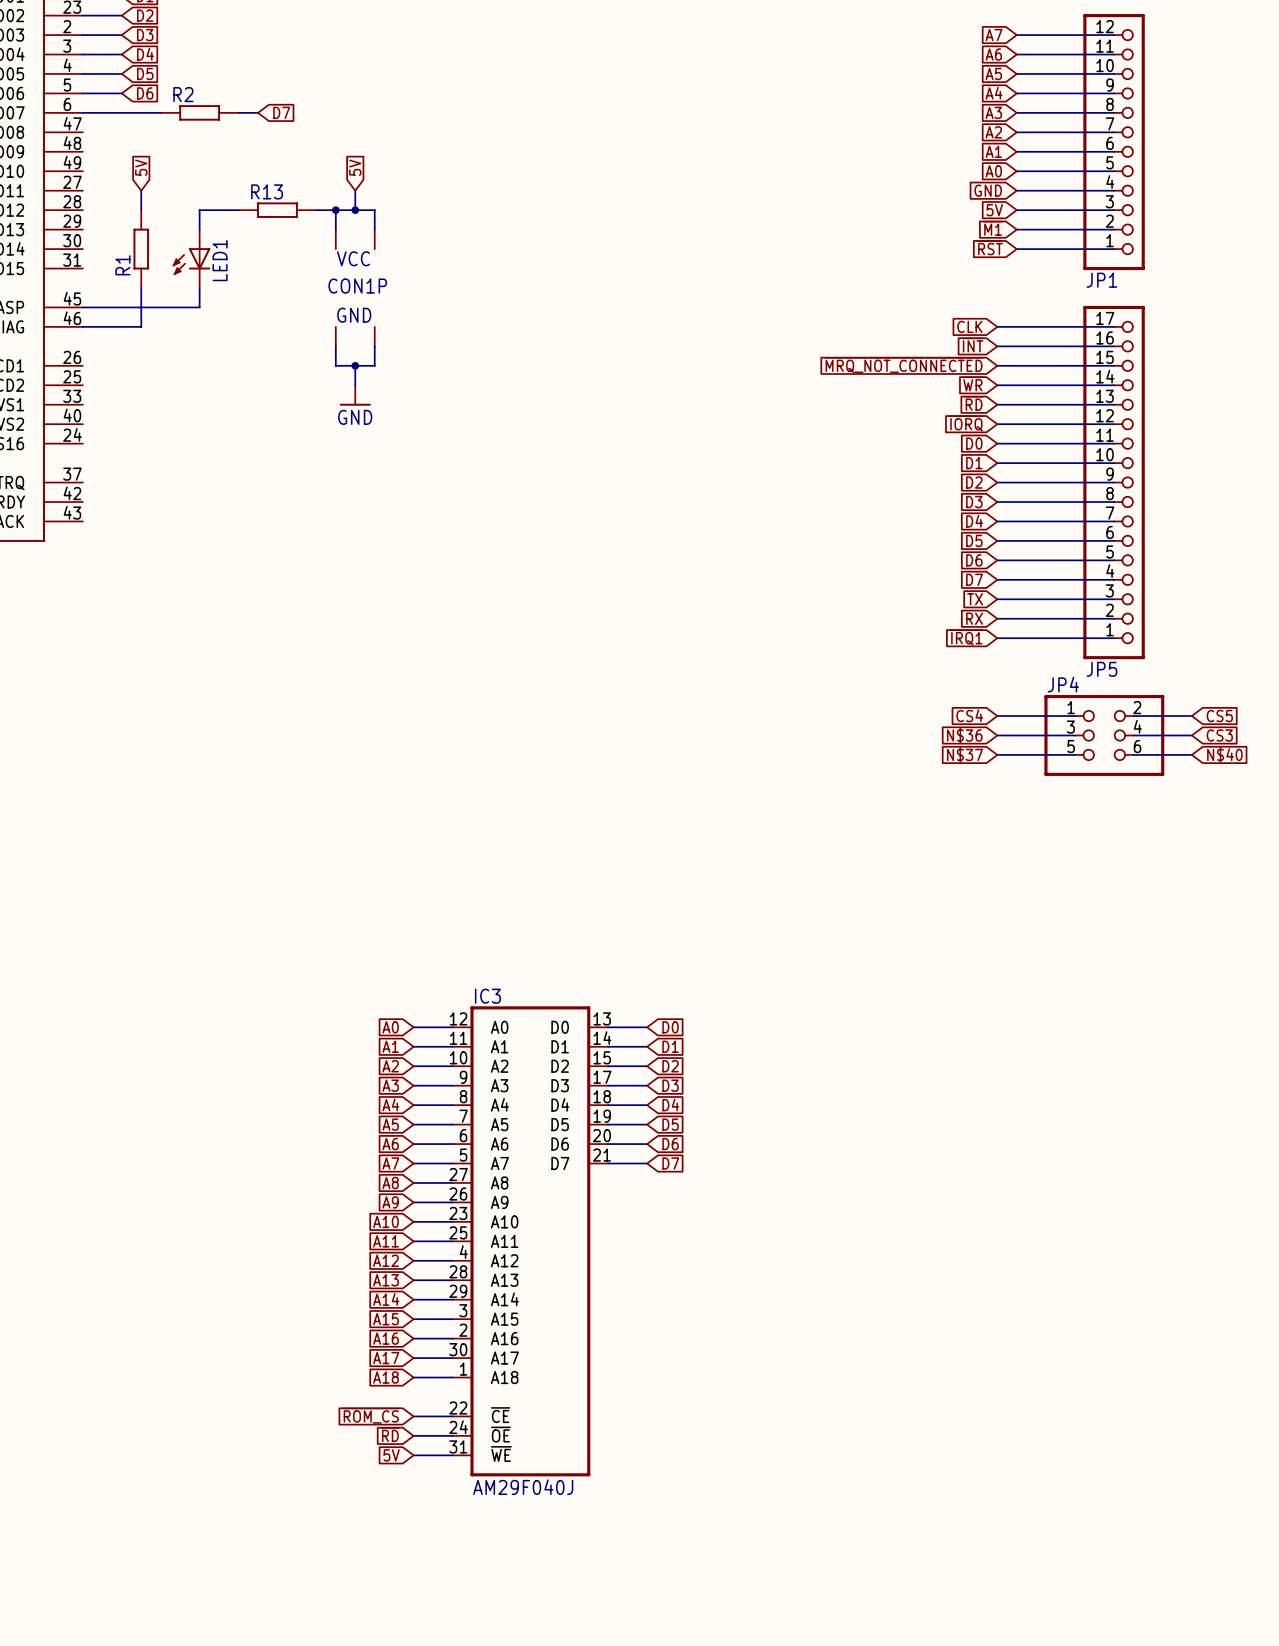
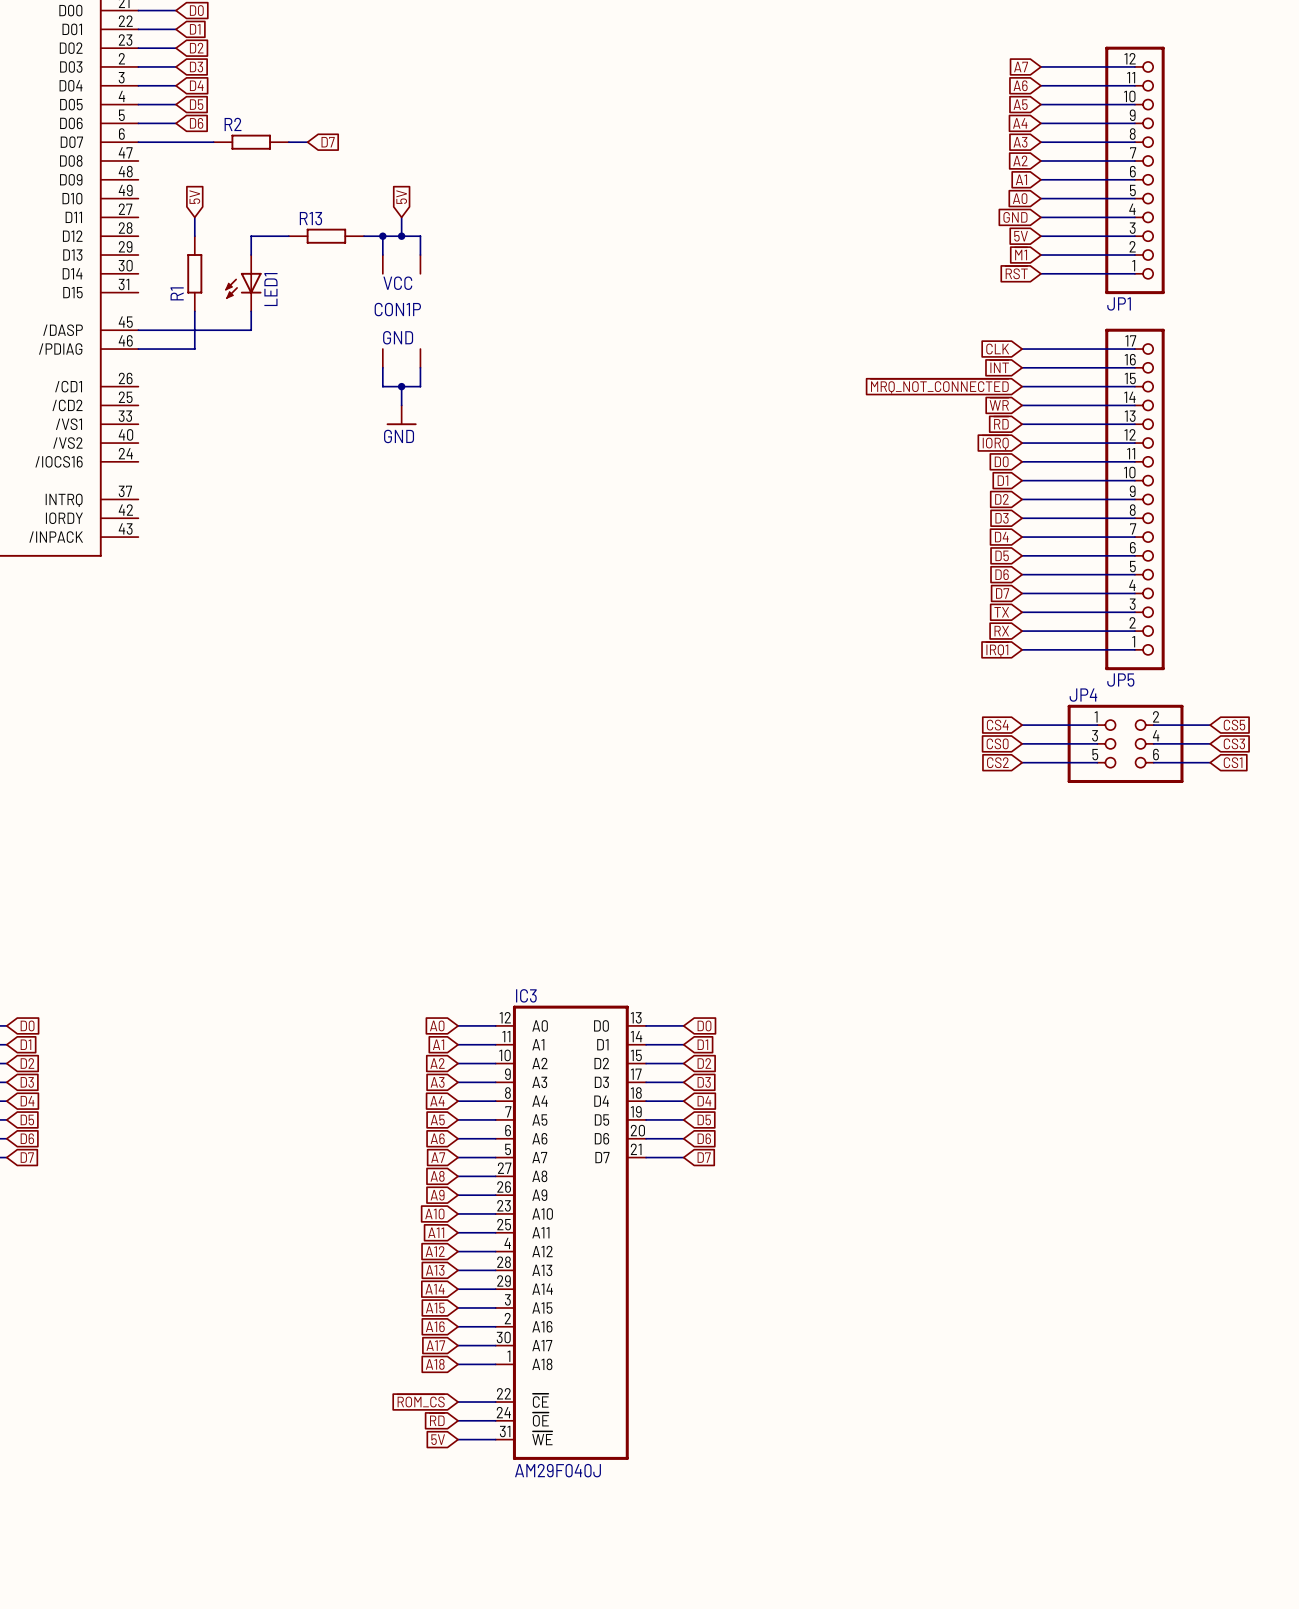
global label: N$36 (964, 735) -> CS0 (997, 743)
global label: N$37 (965, 754) -> CS2 (997, 762)
global label: N$40 (1224, 754) -> CS1 (1233, 762)

